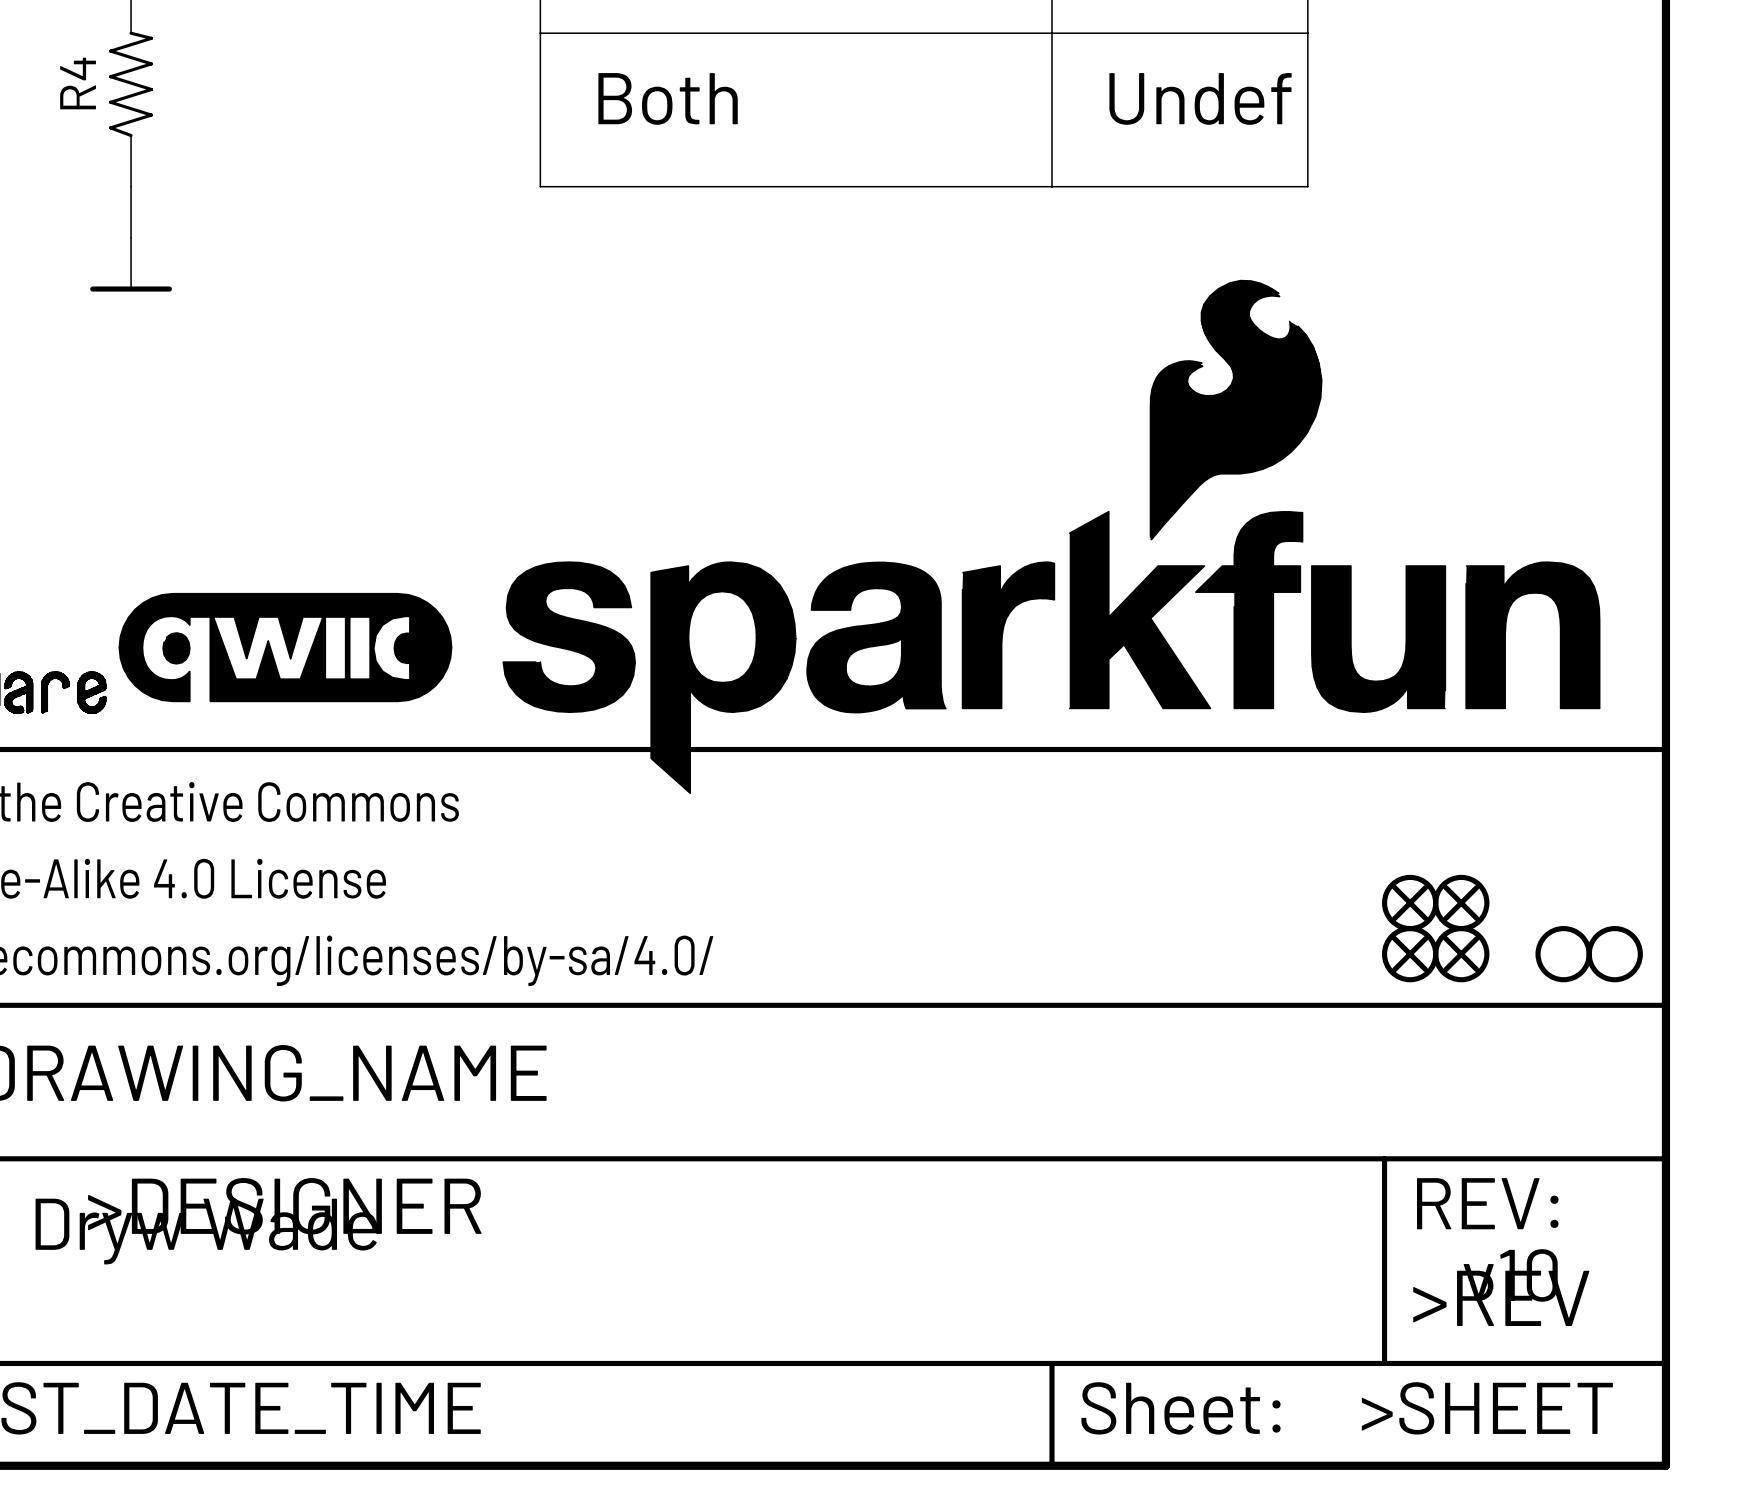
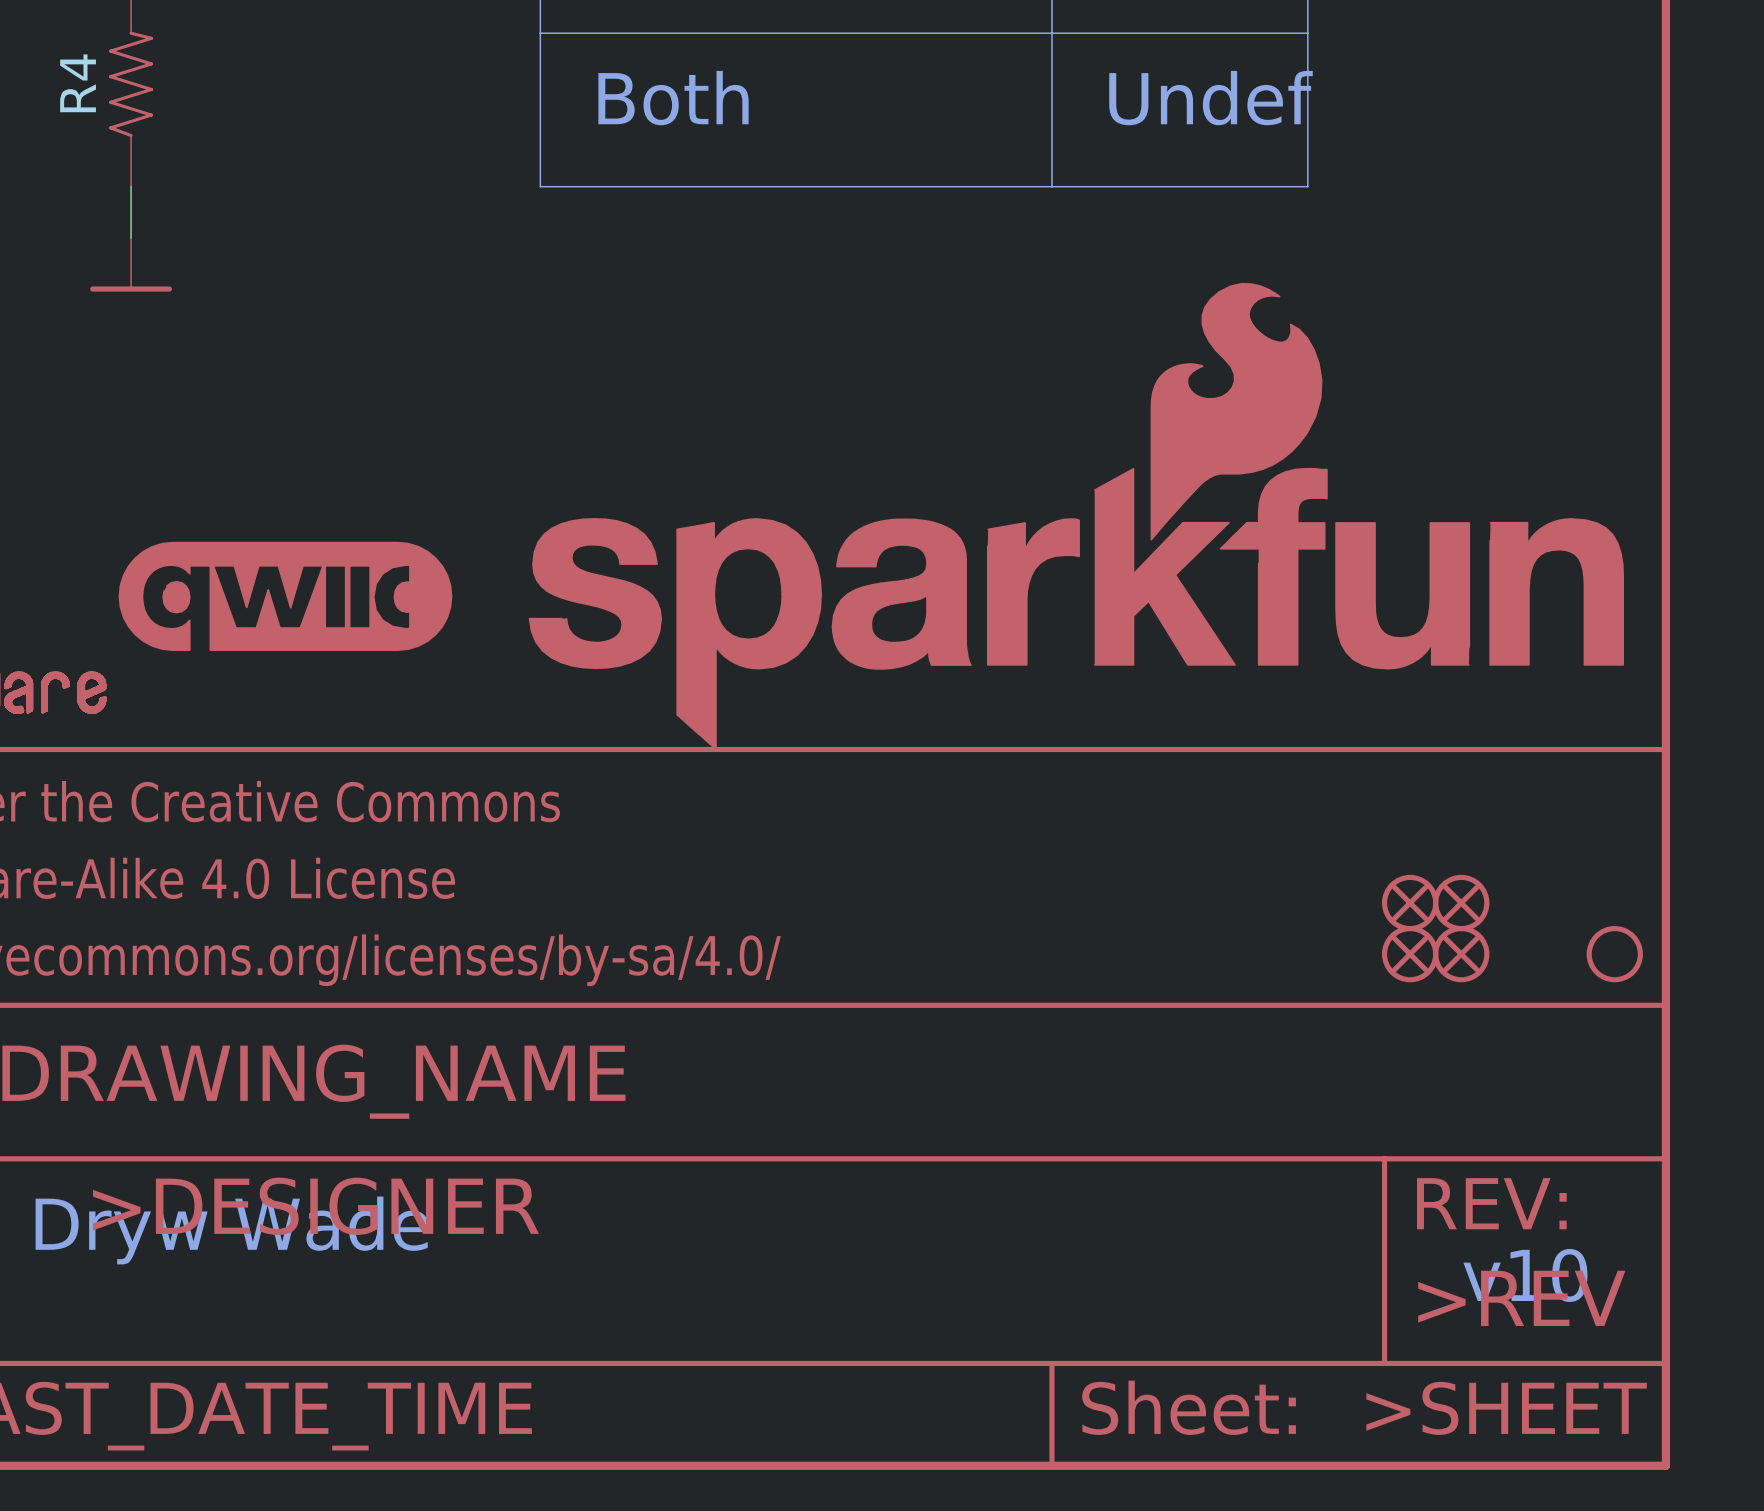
part: (1051, 536) -> none
part: none -> (1076, 609)
part position: (285, 647) -> (285, 596)
part: (1563, 954) -> none

